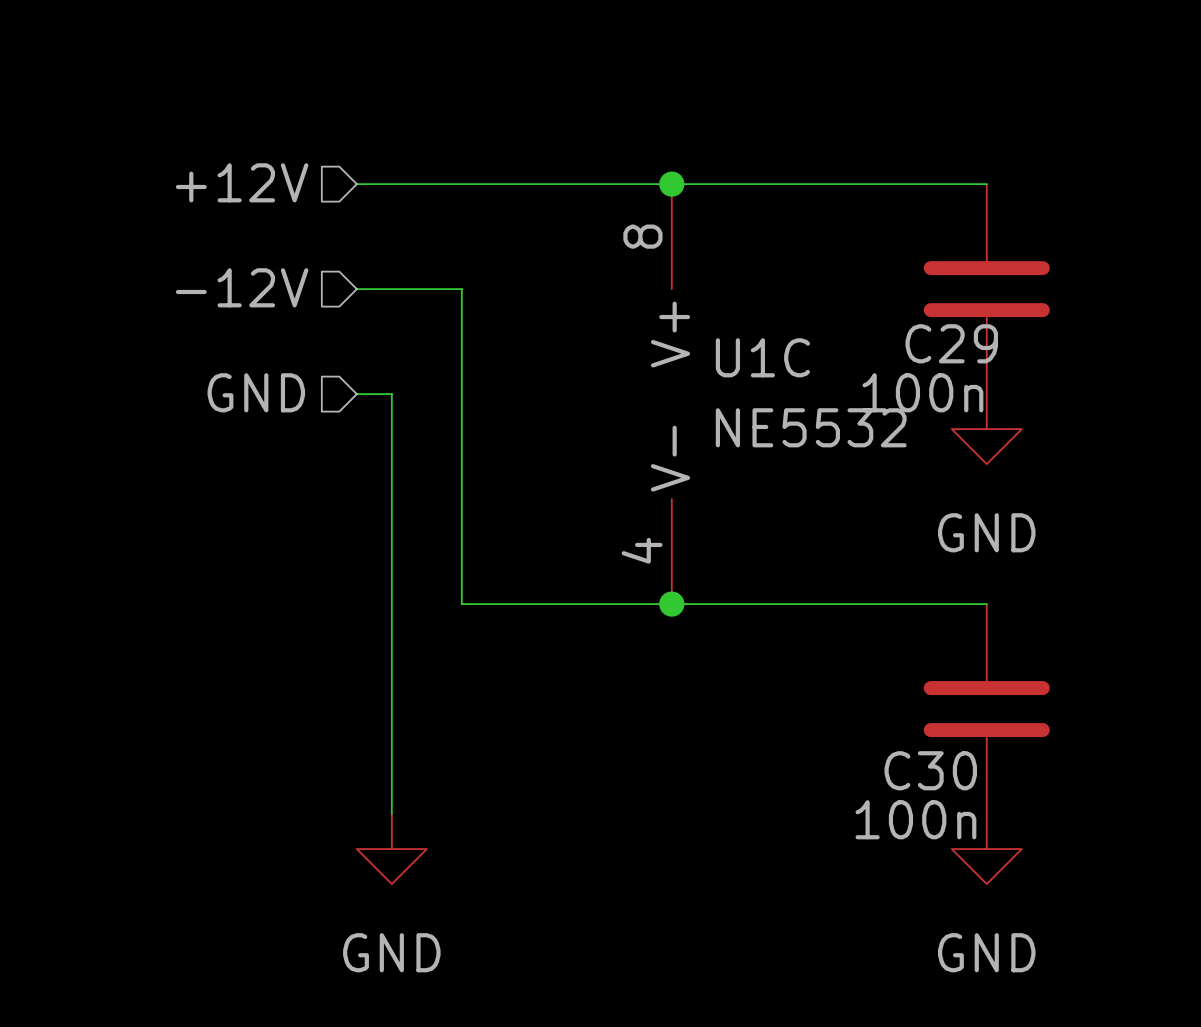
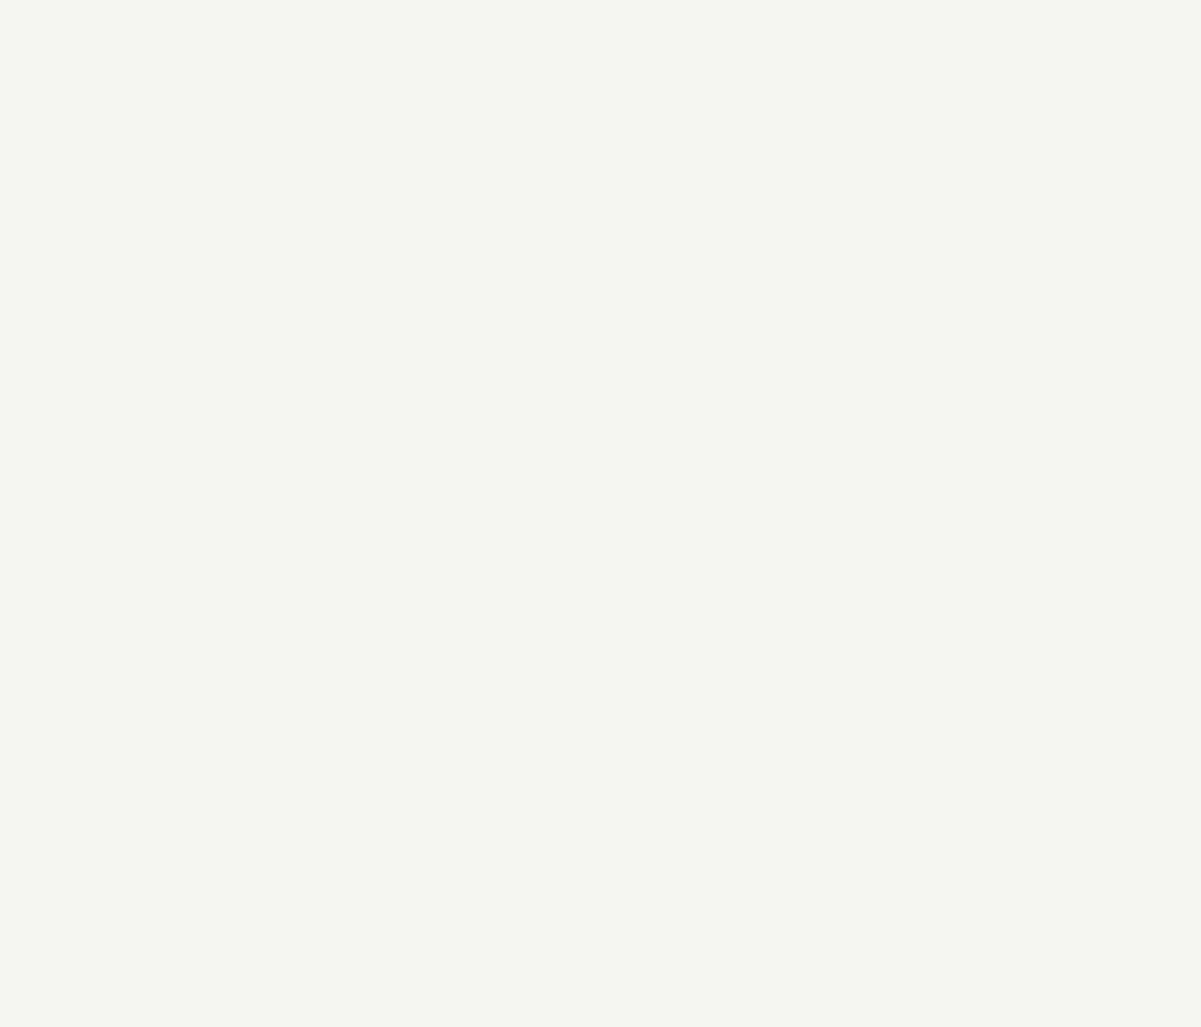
hierarchical label: +12V (242, 182) -> none
wire: (356, 184) (986, 184) -> none
junction: (671, 184) -> none
hierarchical label: -12V (242, 287) -> none
wire: (356, 289) (461, 289) (461, 604) (986, 604) -> none
C29: 100n (986, 289) -> none
hierarchical label: GND (256, 392) -> none
wire: (356, 394) (391, 394) (391, 814) -> none
U1C: NE5532 (671, 394) -> none
power symbol: GND (986, 429) -> none
junction: (671, 604) -> none
C30: 100n (986, 709) -> none
power symbol: GND (391, 849) -> none
power symbol: GND (986, 849) -> none

